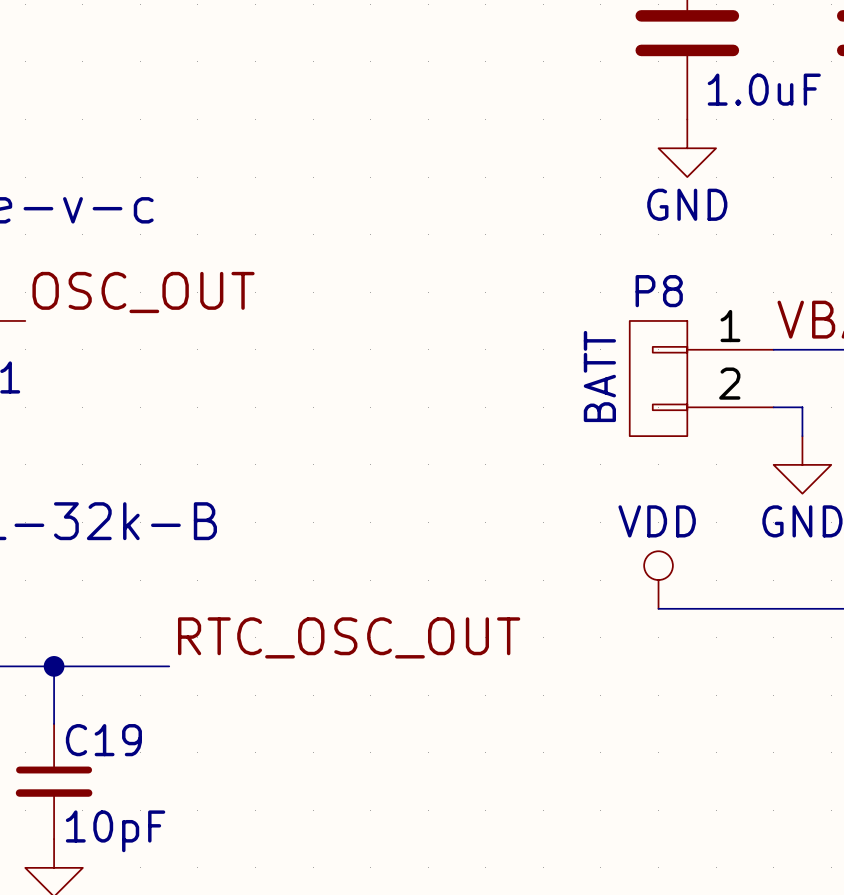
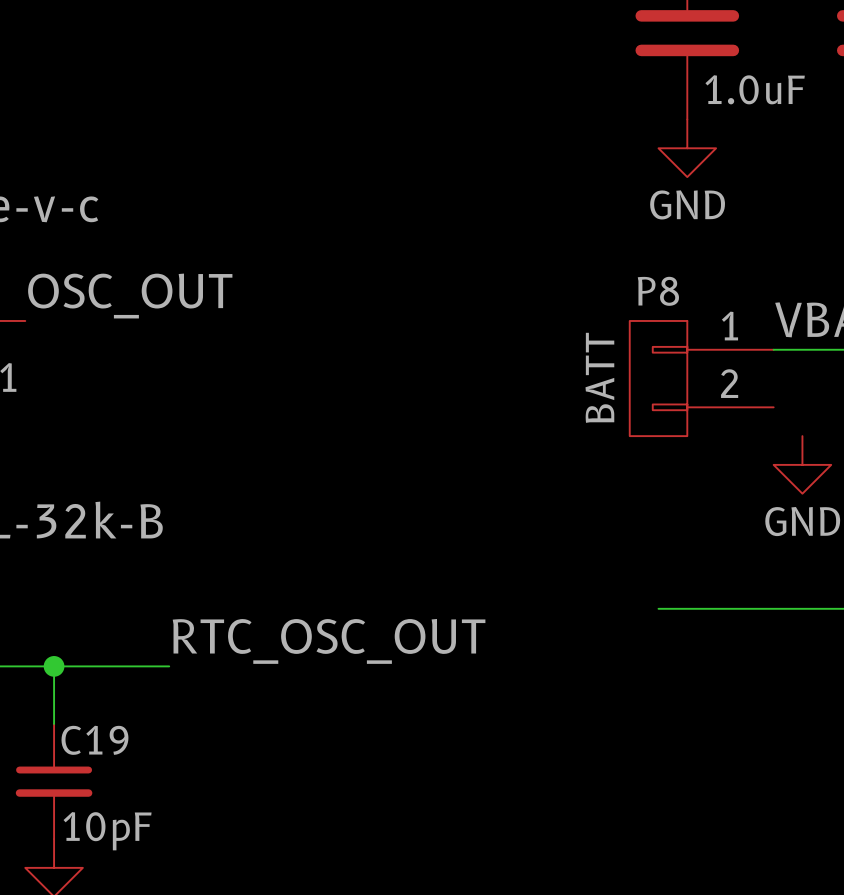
wire: (773, 407) (802, 407) (802, 436) -> none
power symbol: VDD (658, 580) -> none

